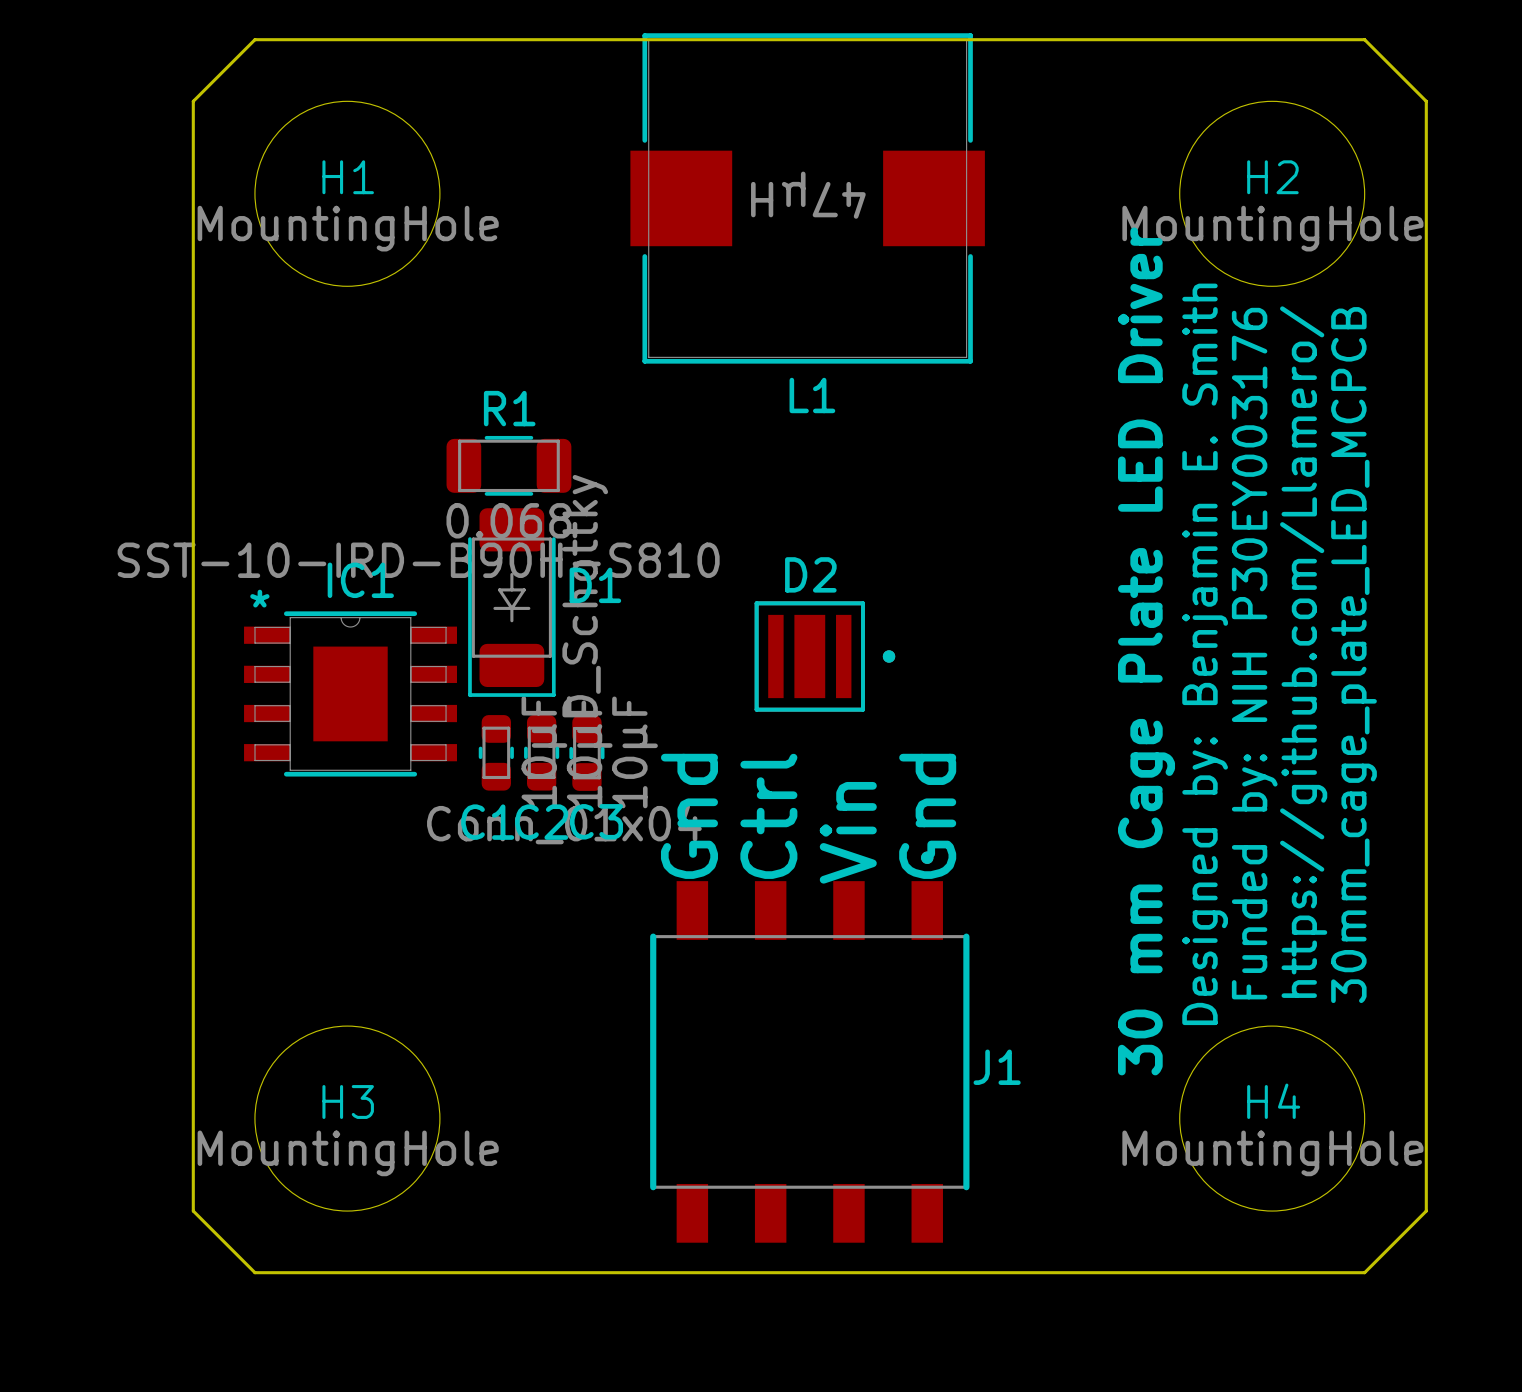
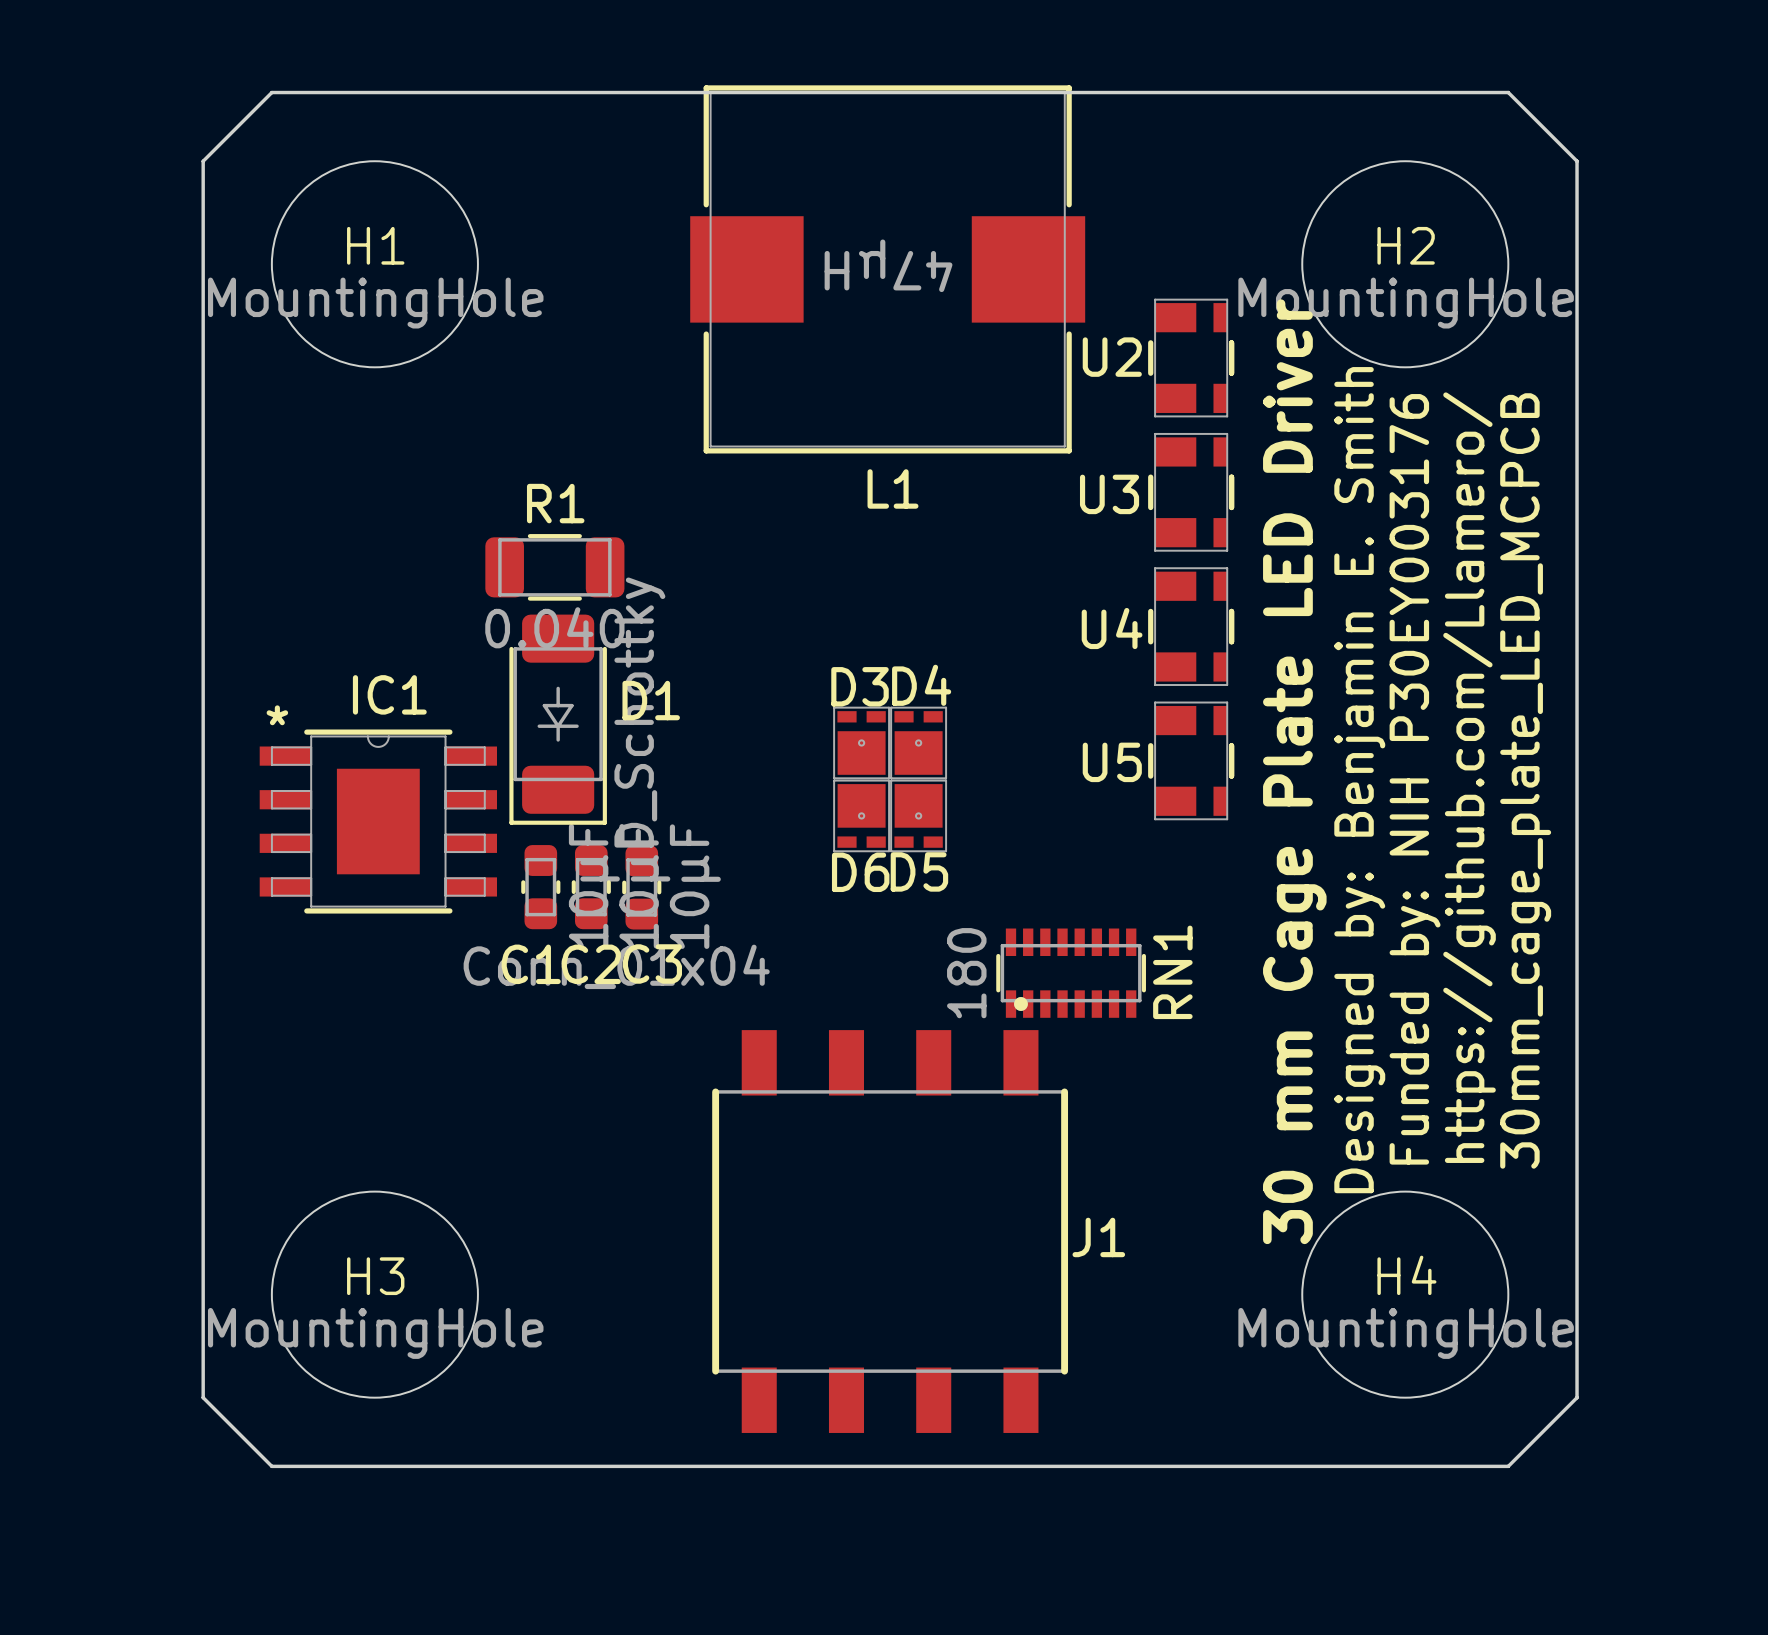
U2: none -> (1191, 358)
U3: none -> (1191, 492)
U4: none -> (1191, 626)
R1 value: 0.068 (508, 520) -> 0.040 (554, 627)
D3: none -> (861, 742)
D4: none -> (918, 742)
U5: none -> (1191, 760)
text position: 30 mm Cage Plate LED Driver (1146, 651) -> 30 mm Cage Plate LED Driver (1294, 771)
text position: https://github.com/Llamero/ (1303, 652) -> https://github.com/Llamero/ (1469, 777)
text position: Funded by: NIH P30EY003176 (1254, 653) -> Funded by: NIH P30EY003176 (1415, 779)
text position: Designed by: Benjamin E. Smith (1205, 654) -> Designed by: Benjamin E. Smith (1359, 780)
text position: 30mm_cage_plate_LED_MCPCB (1354, 655) -> 30mm_cage_plate_LED_MCPCB (1525, 780)
D2: SST-10-IRD-B90H-S810 (824, 656) -> none
D6: none -> (861, 815)
D5: none -> (918, 815)
text: Gnd (689, 816) -> none
text: Ctrl (768, 816) -> none
text: Gnd (927, 816) -> none
RN1: none -> 180 (1071, 973)
text: Vin (848, 832) -> none

